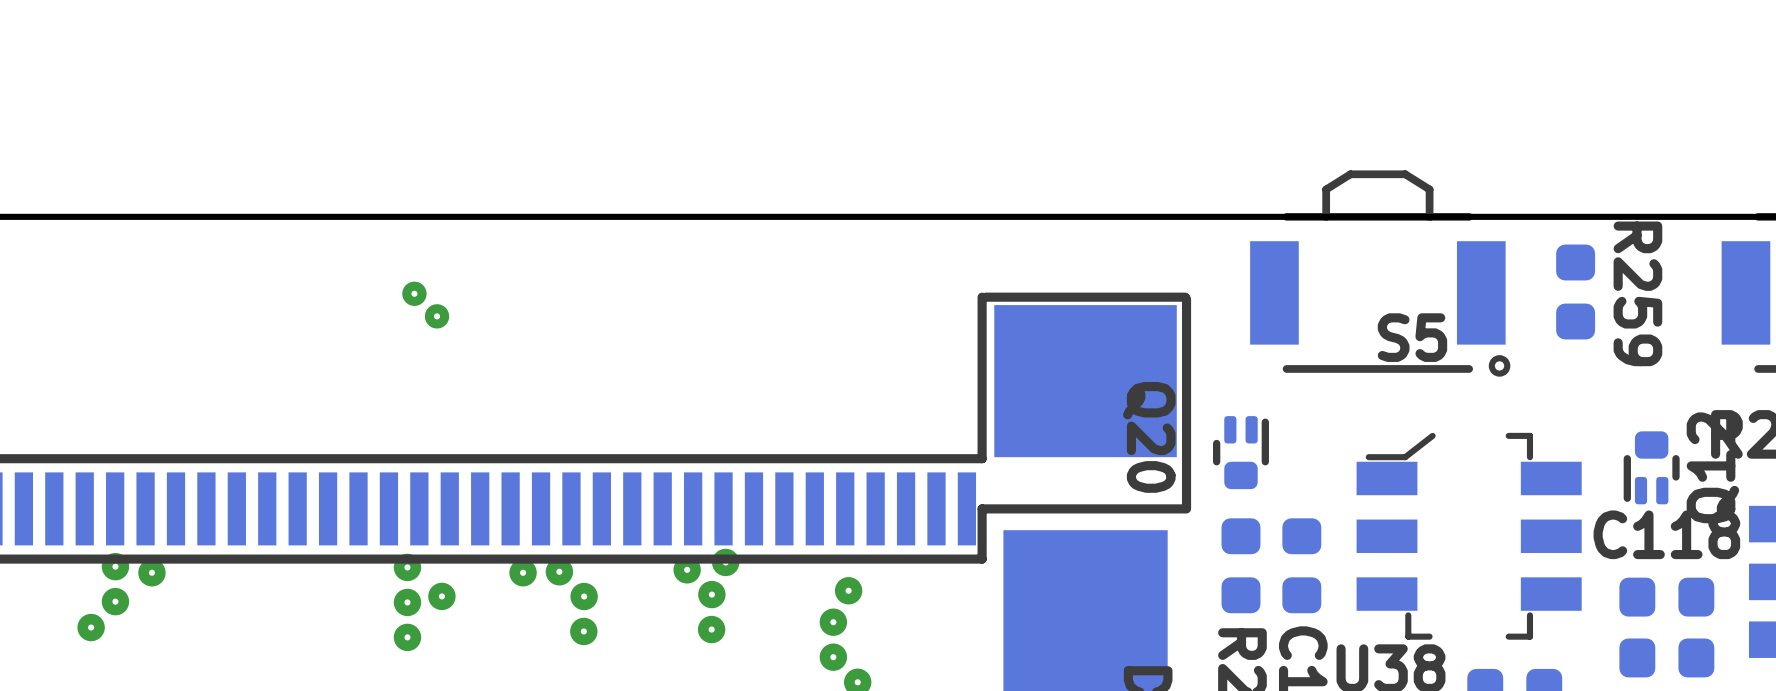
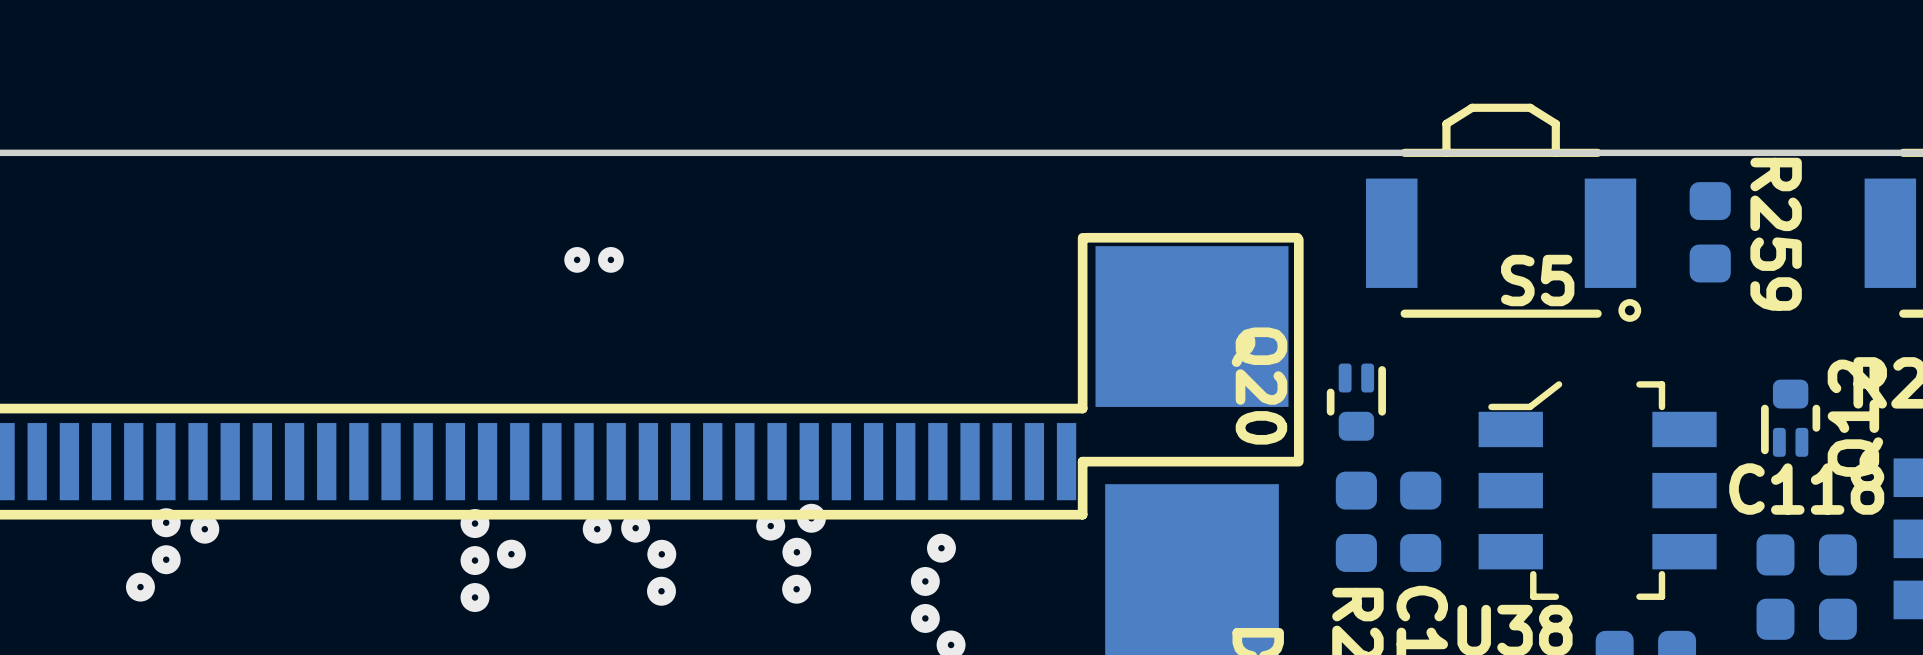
via: (414, 293) -> none
via: (437, 316) -> none
via: none -> (577, 259)
via: none -> (610, 259)

